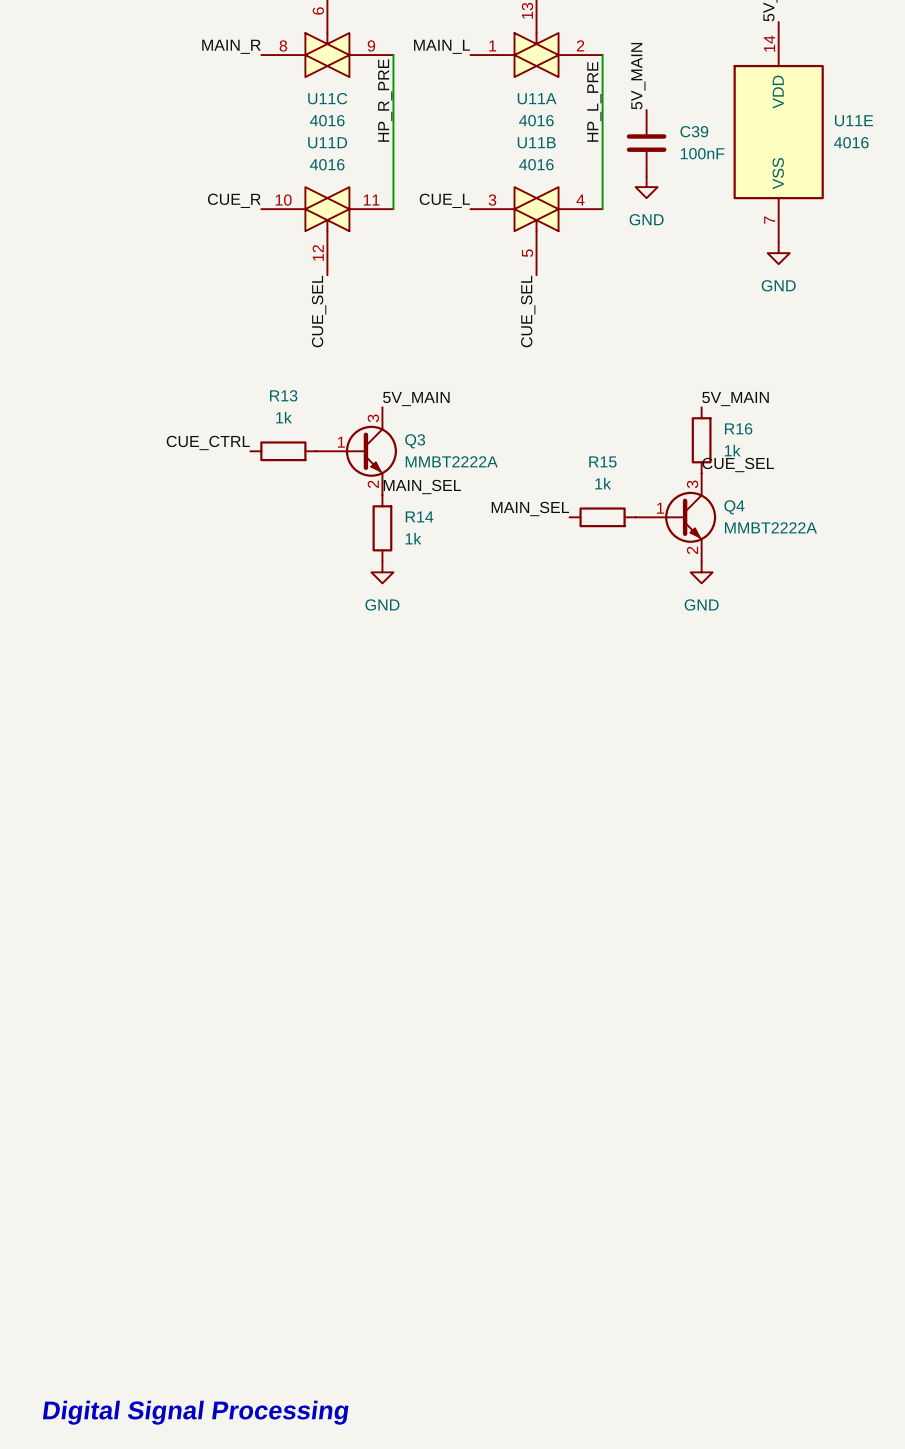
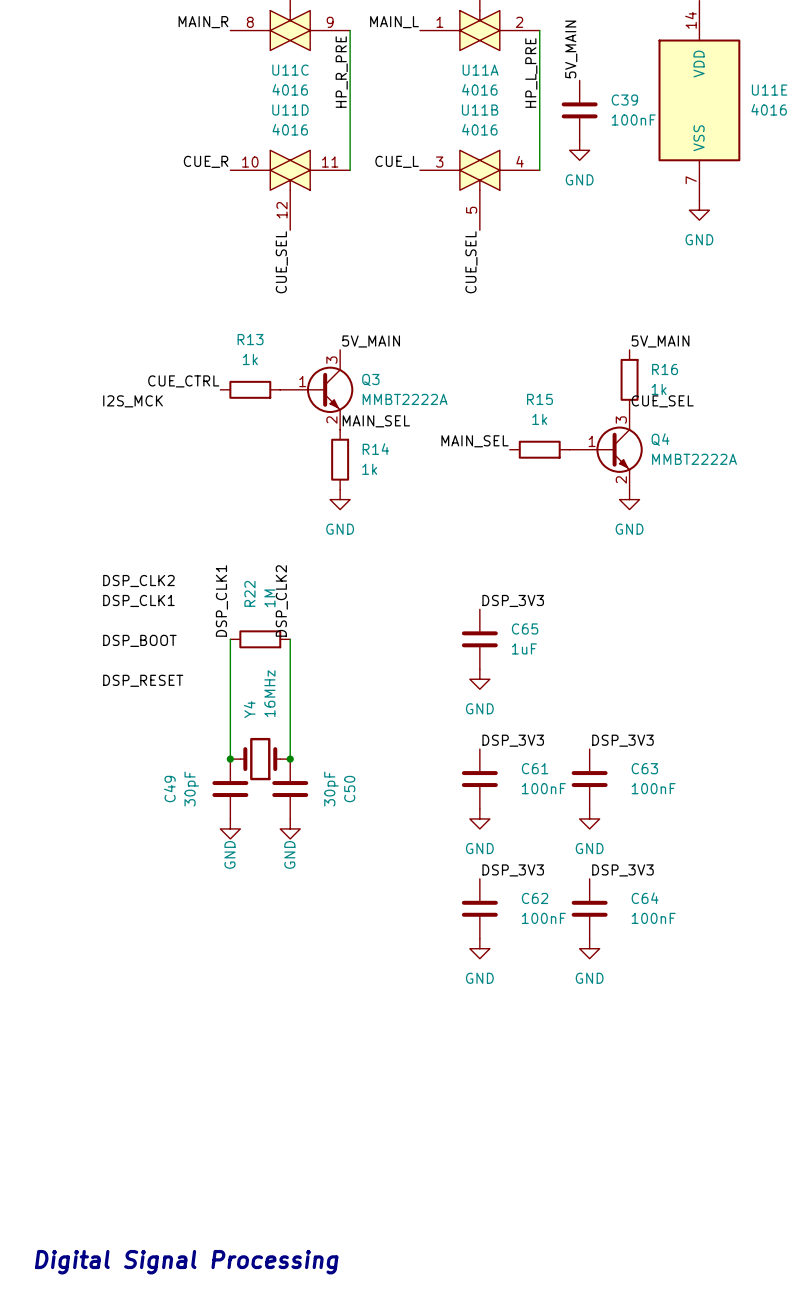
label: none -> I2S_MCK (133, 401)
label: none -> DSP_CLK2 (138, 581)
label: none -> DSP_CLK1 (138, 600)
label: none -> DSP_CLK1 (221, 601)
label: none -> DSP_CLK2 (281, 601)
label: none -> DSP_3V3 (513, 600)
wire: none -> (230, 639) (230, 759)
R22: none -> 1M (260, 639)
wire: none -> (290, 639) (290, 759)
C65: none -> 1uF (479, 639)
label: none -> DSP_BOOT (139, 640)
power symbol: none -> GND (479, 679)
label: none -> DSP_RESET (143, 680)
label: none -> DSP_3V3 (513, 740)
label: none -> DSP_3V3 (622, 740)
junction: none -> (230, 759)
Y4: none -> 16MHz (260, 759)
junction: none -> (290, 759)
C61: none -> 100nF (479, 779)
C63: none -> 100nF (589, 779)
C49: none -> 30pF (230, 789)
C50: none -> 30pF (290, 789)
power symbol: none -> GND (479, 818)
power symbol: none -> GND (589, 818)
power symbol: none -> GND (230, 828)
power symbol: none -> GND (290, 828)
label: none -> DSP_3V3 (513, 870)
label: none -> DSP_3V3 (622, 870)
C62: none -> 100nF (479, 908)
C64: none -> 100nF (589, 908)
power symbol: none -> GND (479, 948)
power symbol: none -> GND (589, 948)

